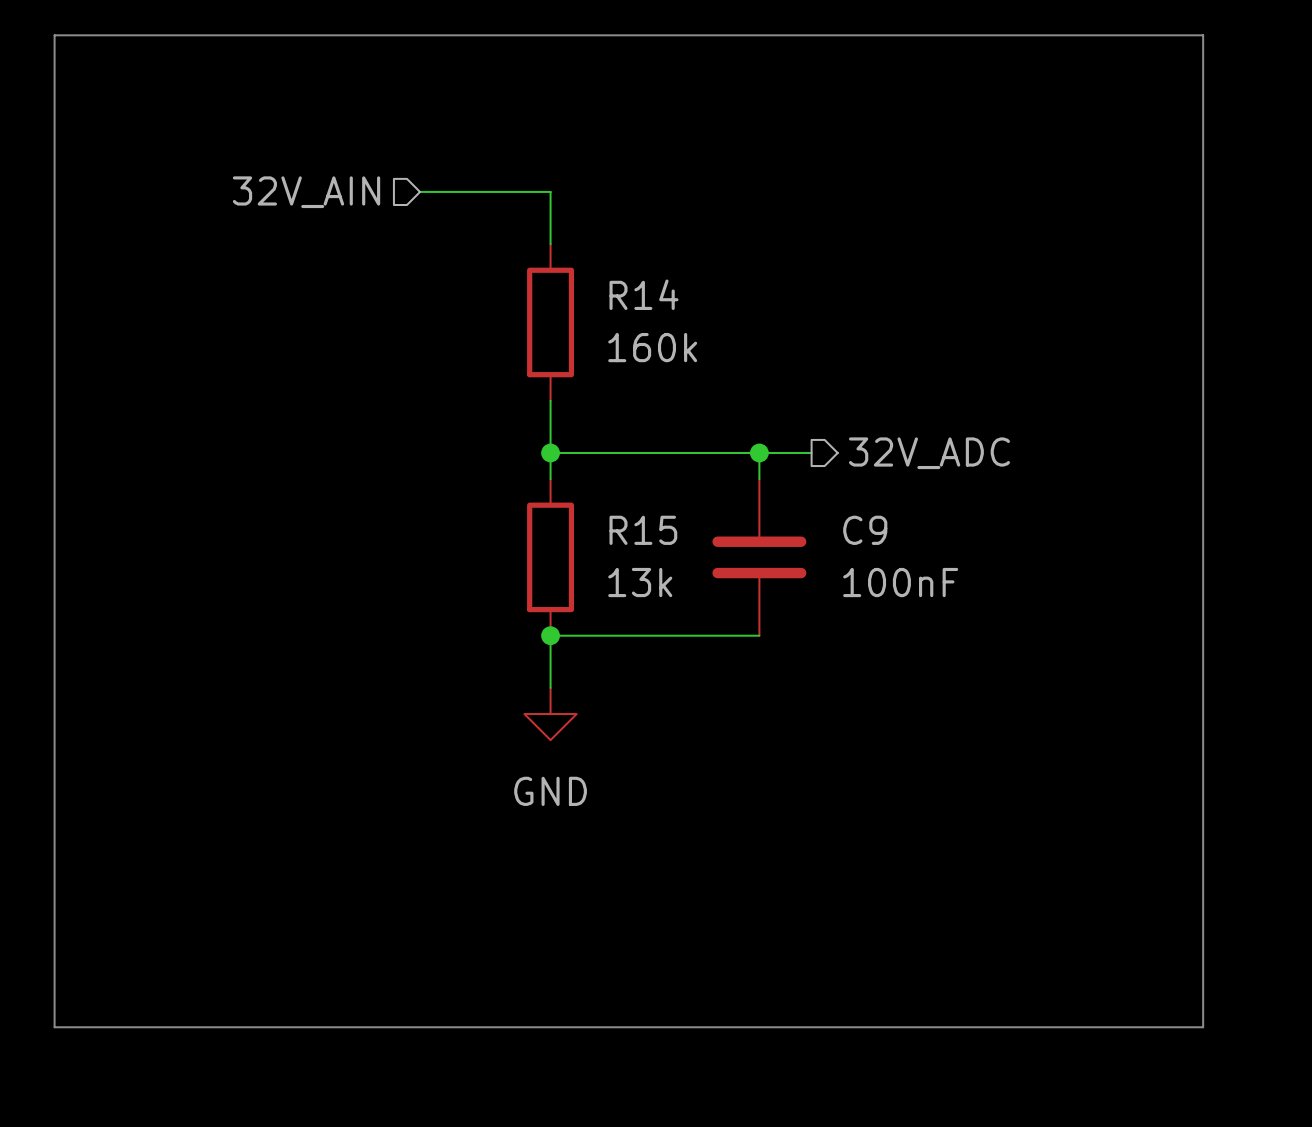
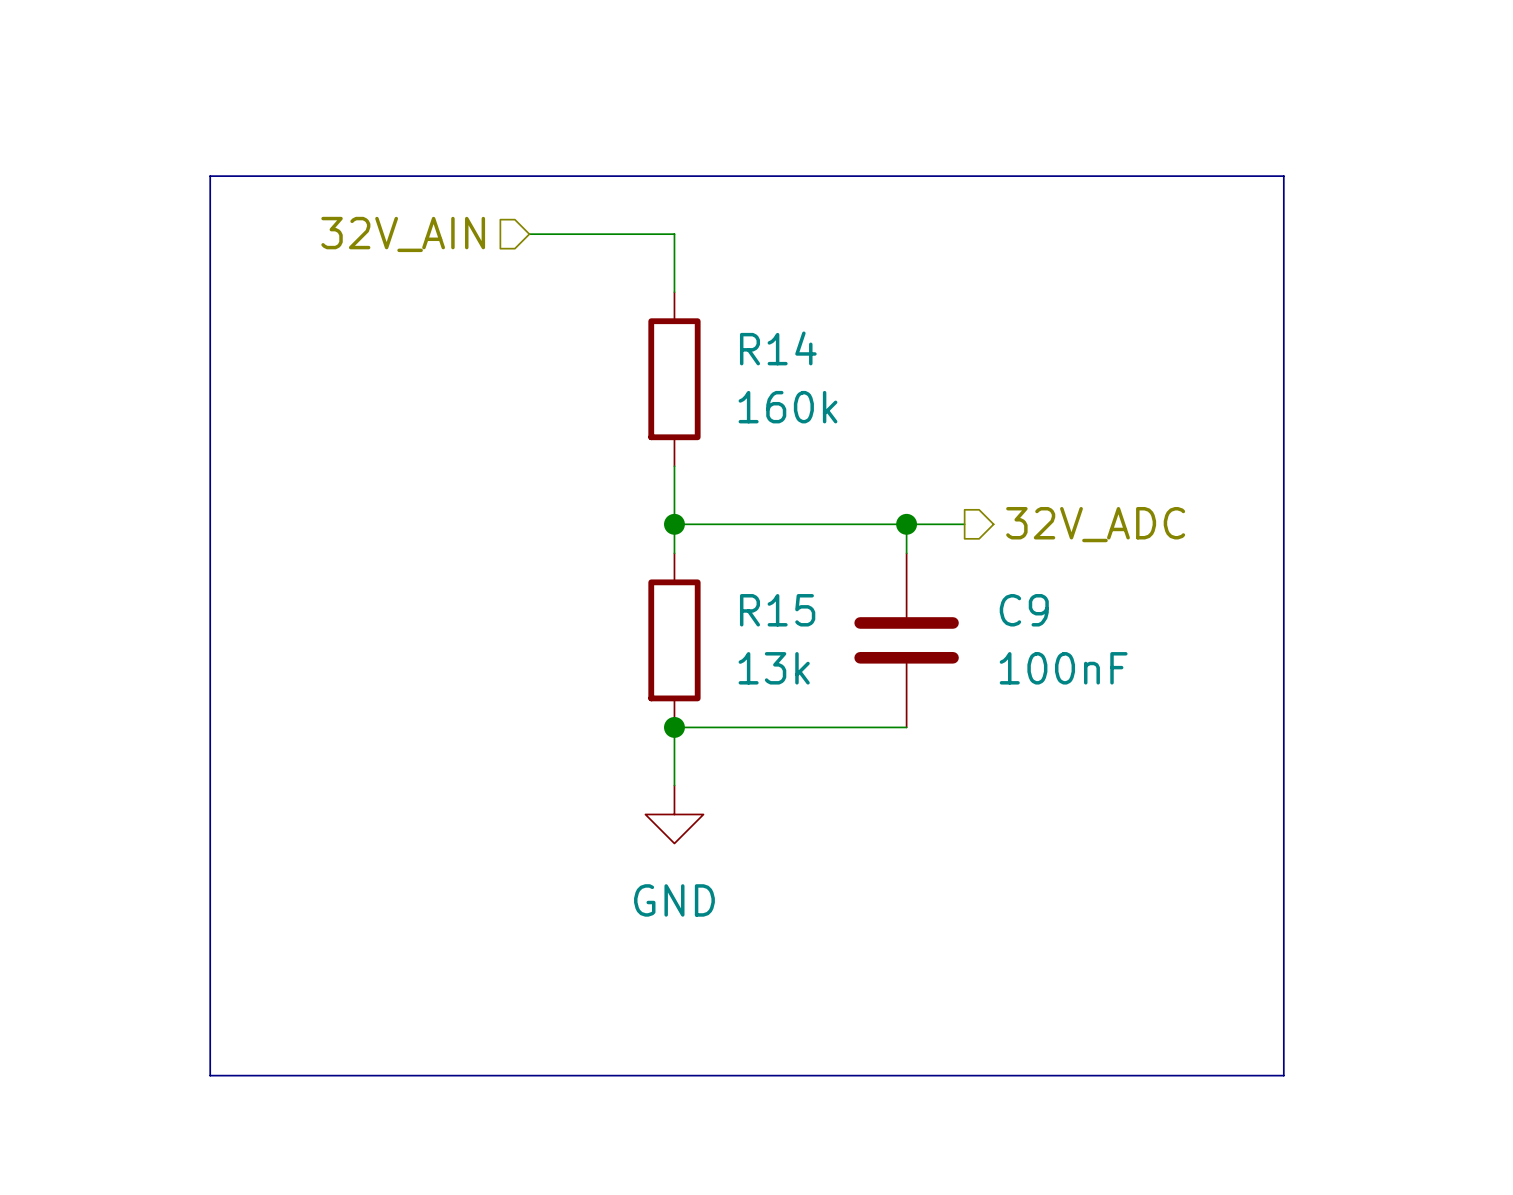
line: (54, 35) (1203, 35) (1203, 1027) (54, 1027) (54, 35) -> (210, 176) (210, 1075) (1283, 1075) (1283, 176) (210, 176)

